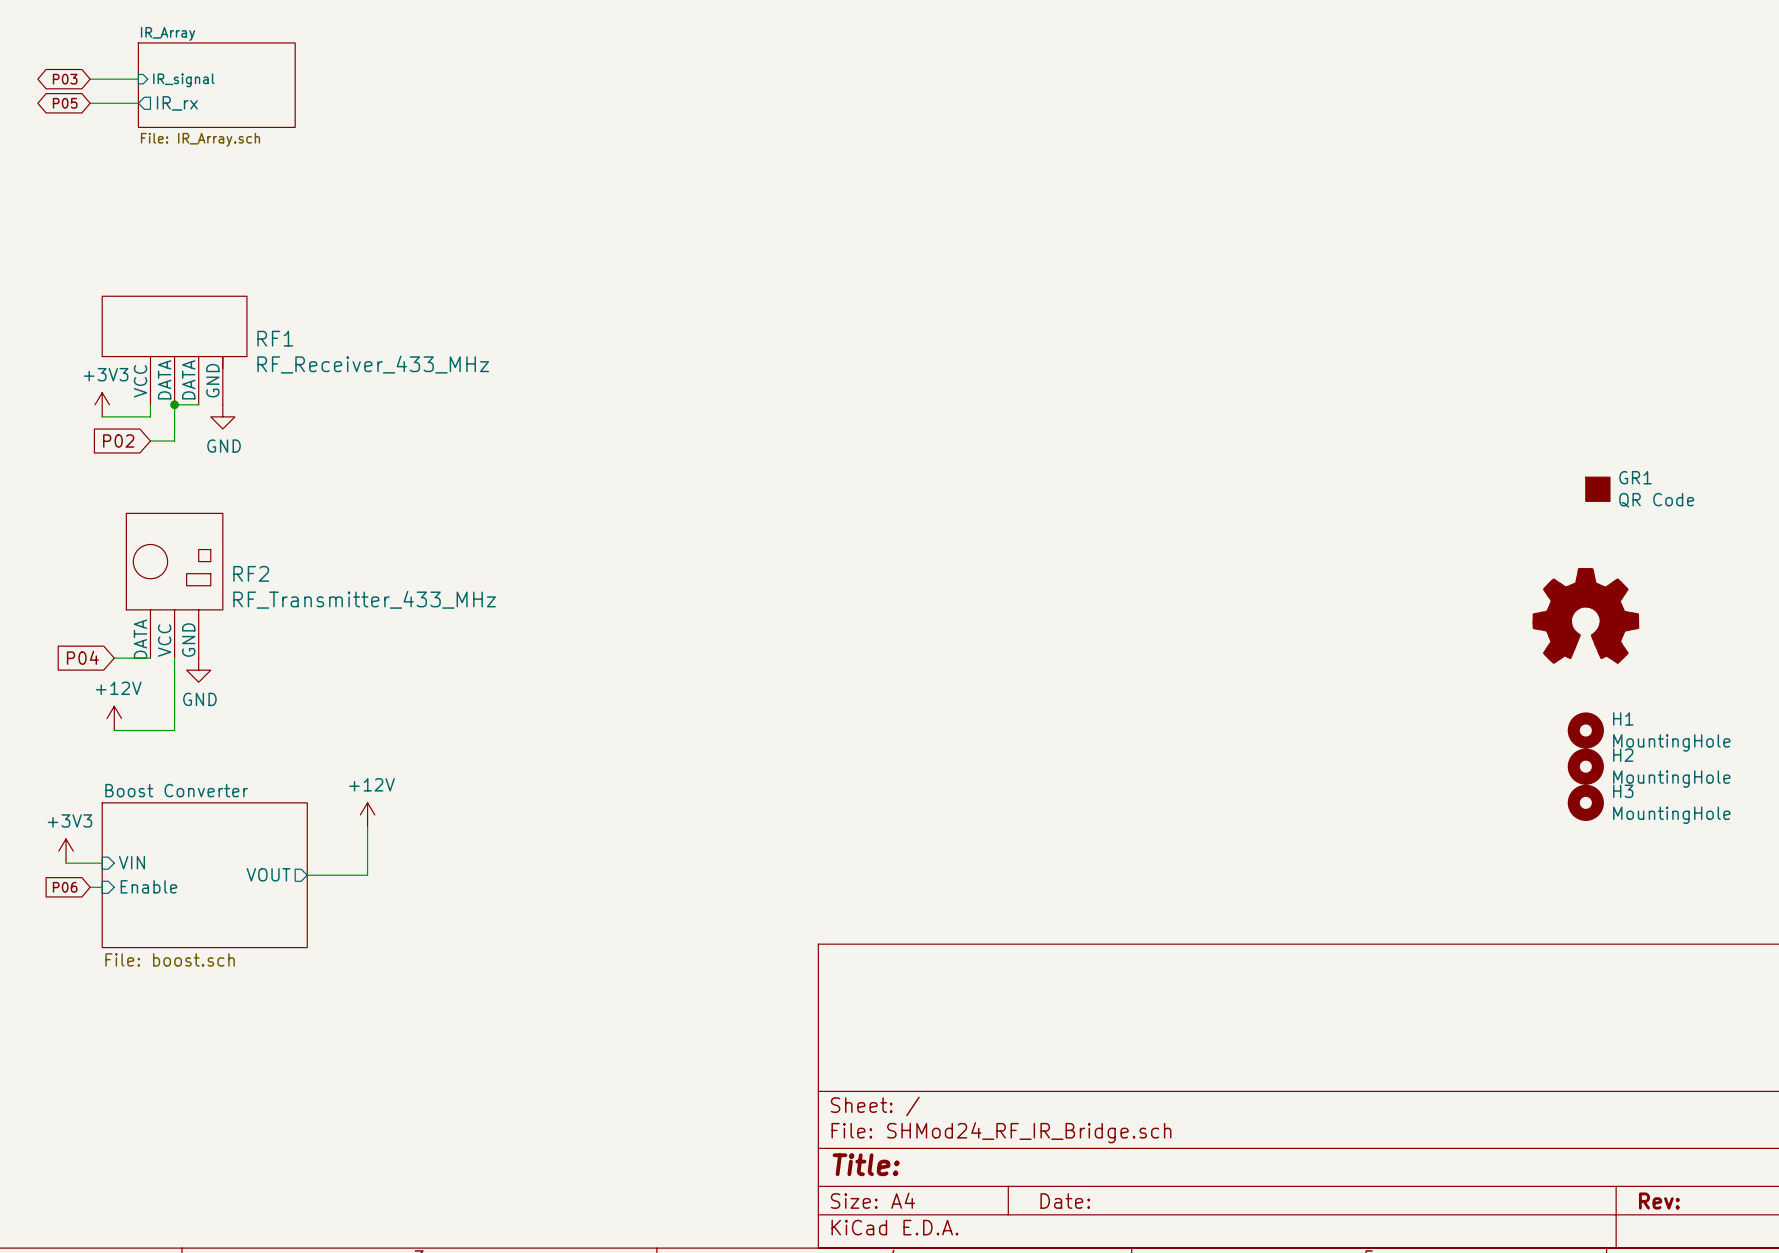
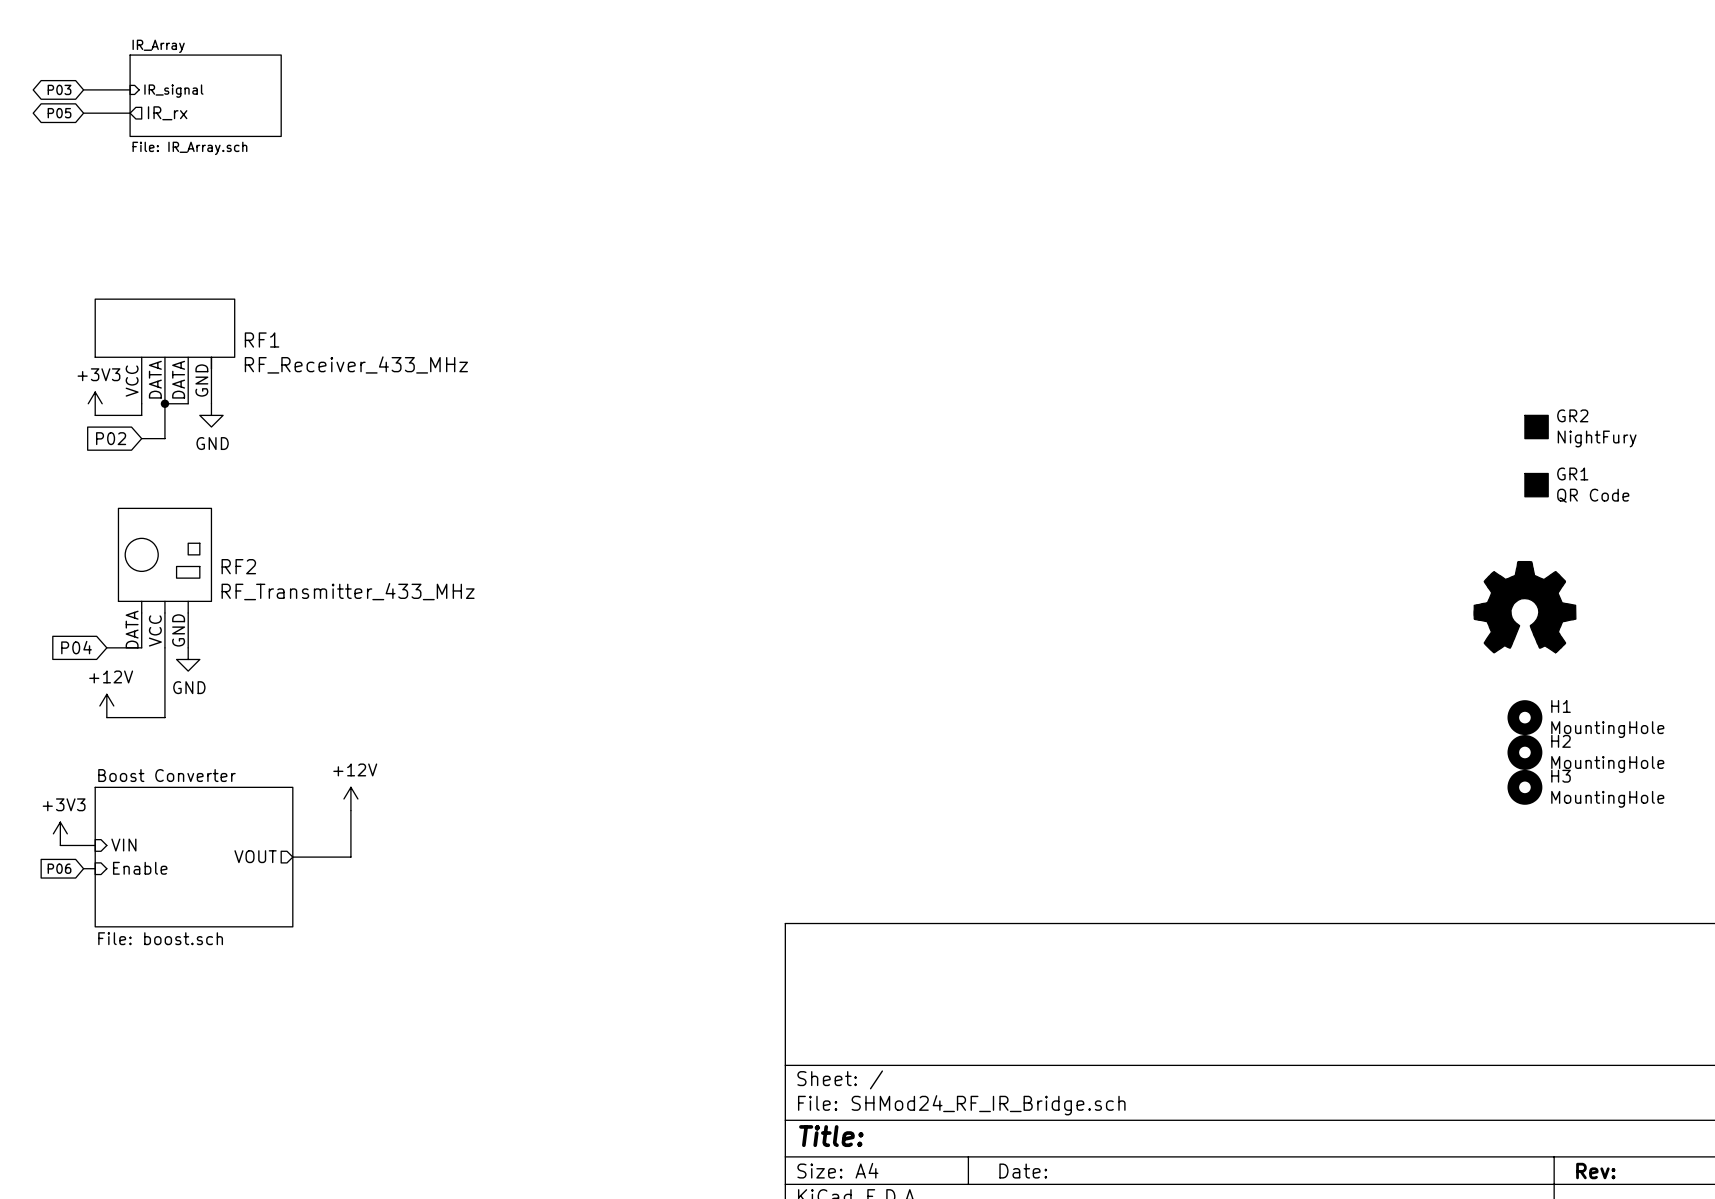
GR2: none -> NightFury (1536, 427)

